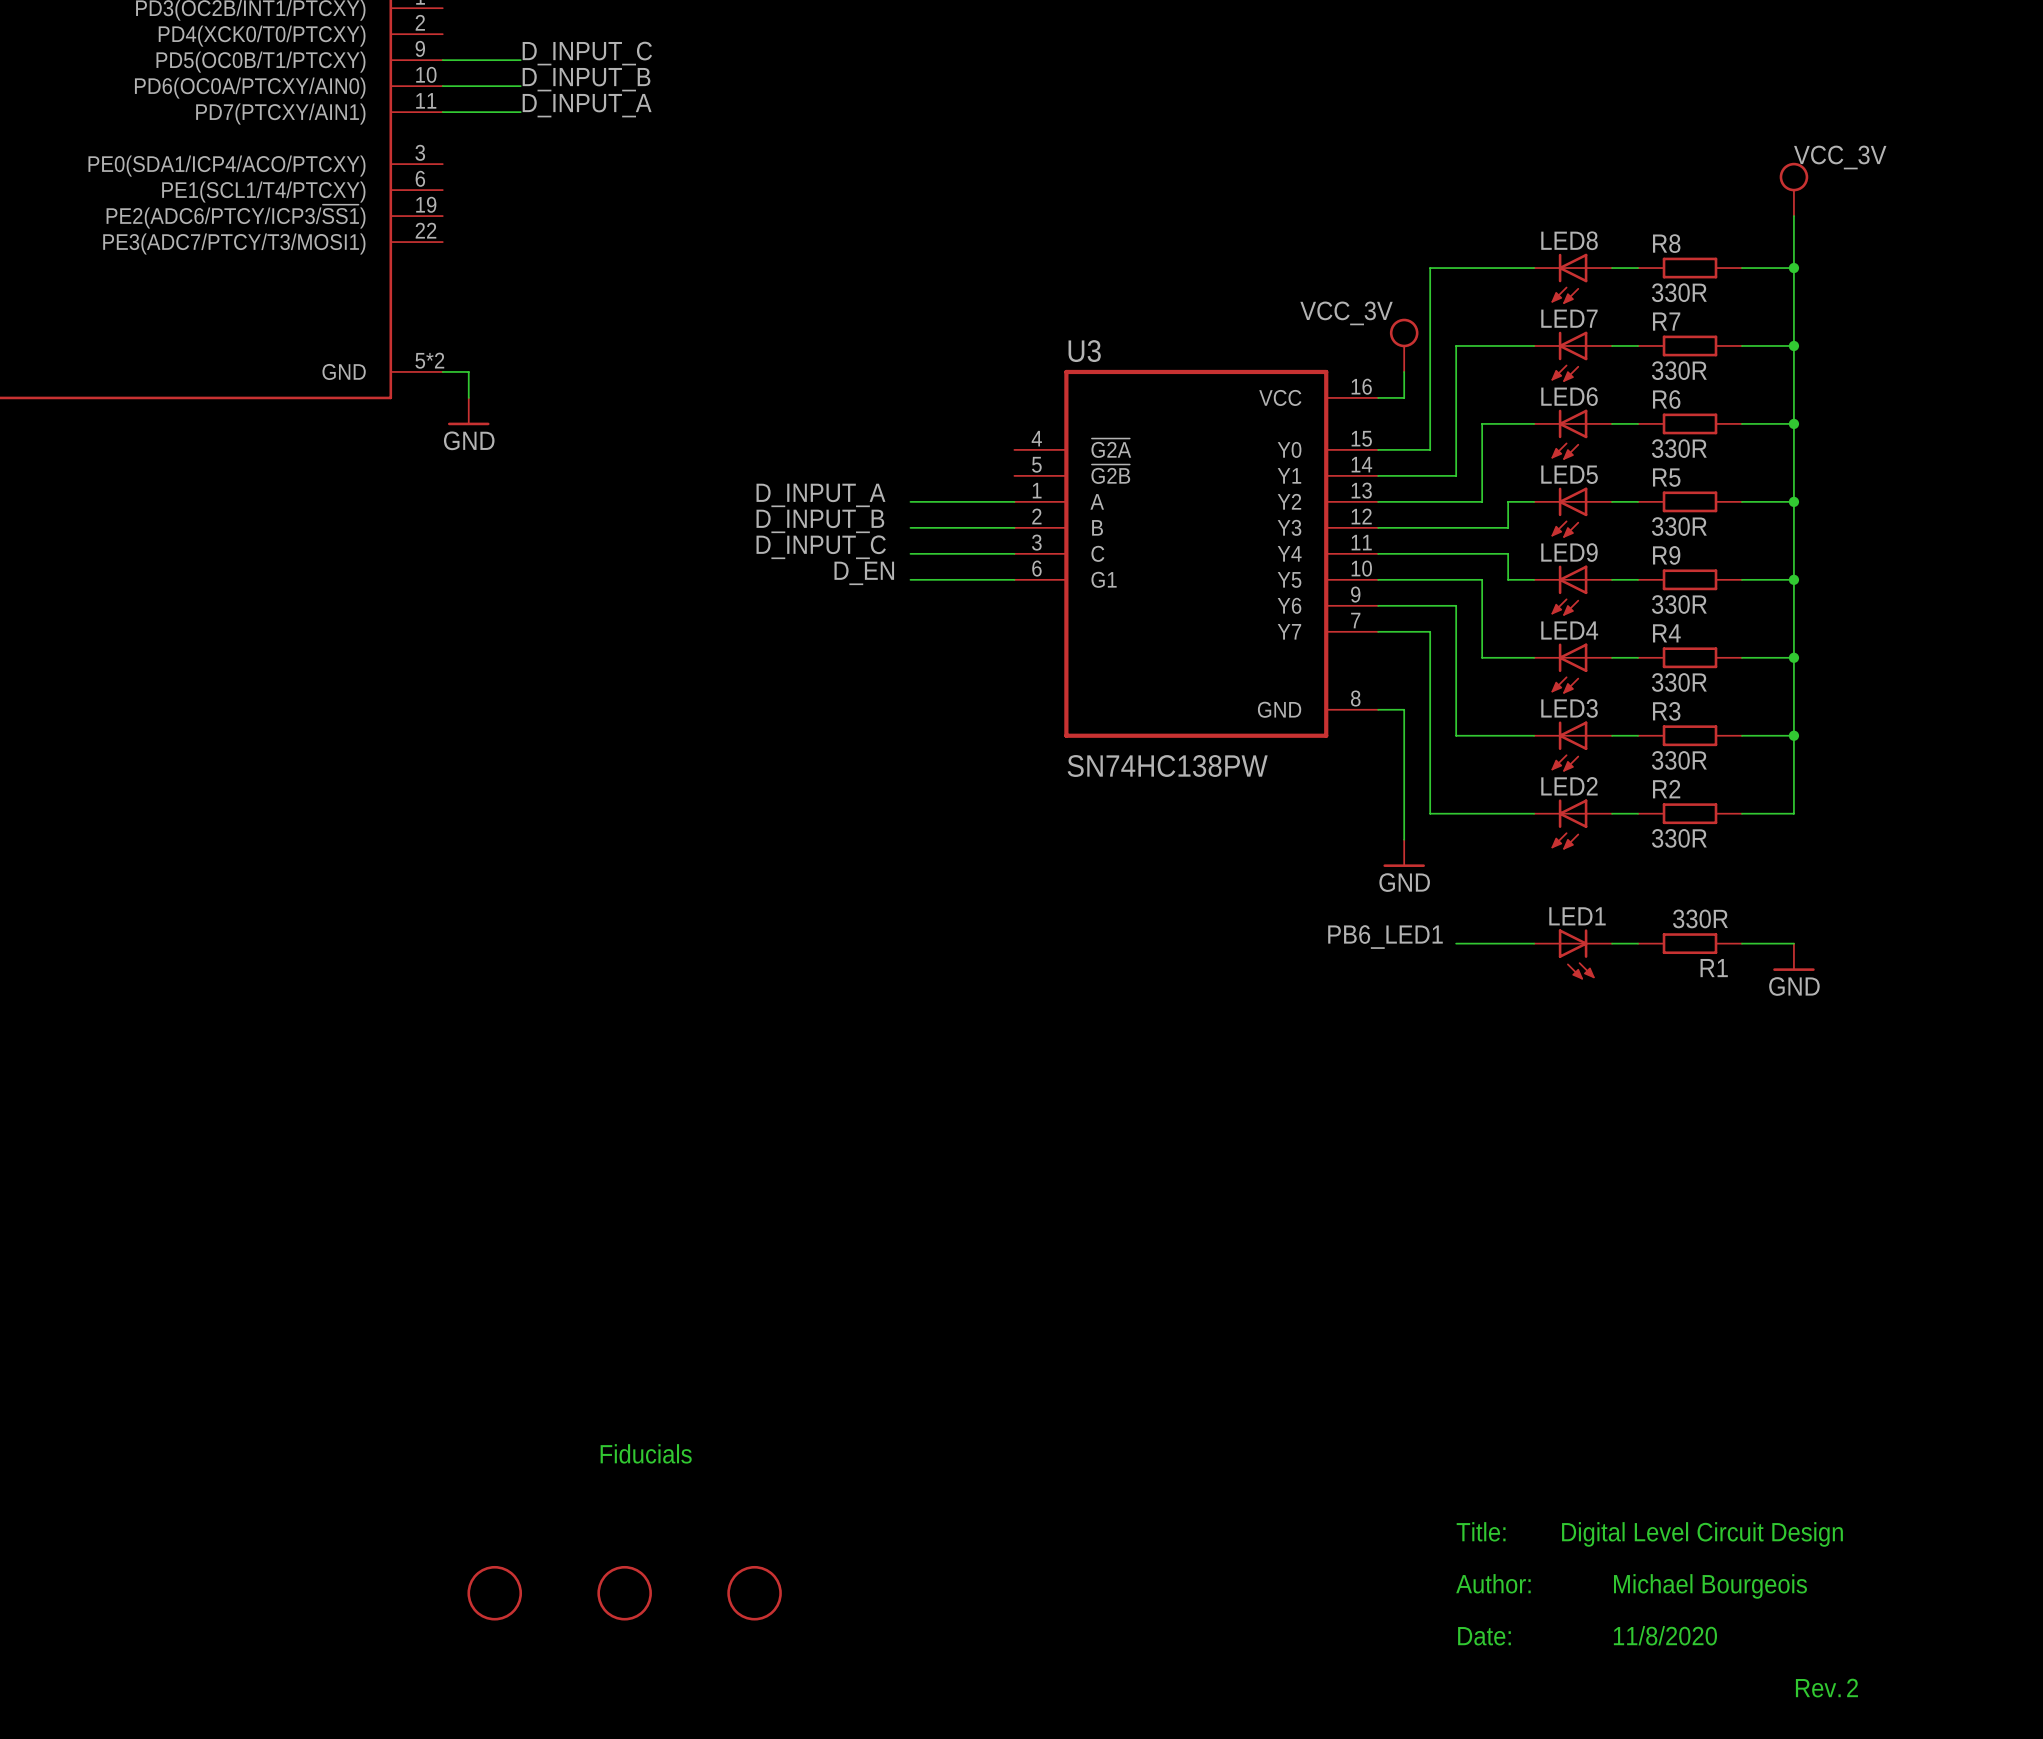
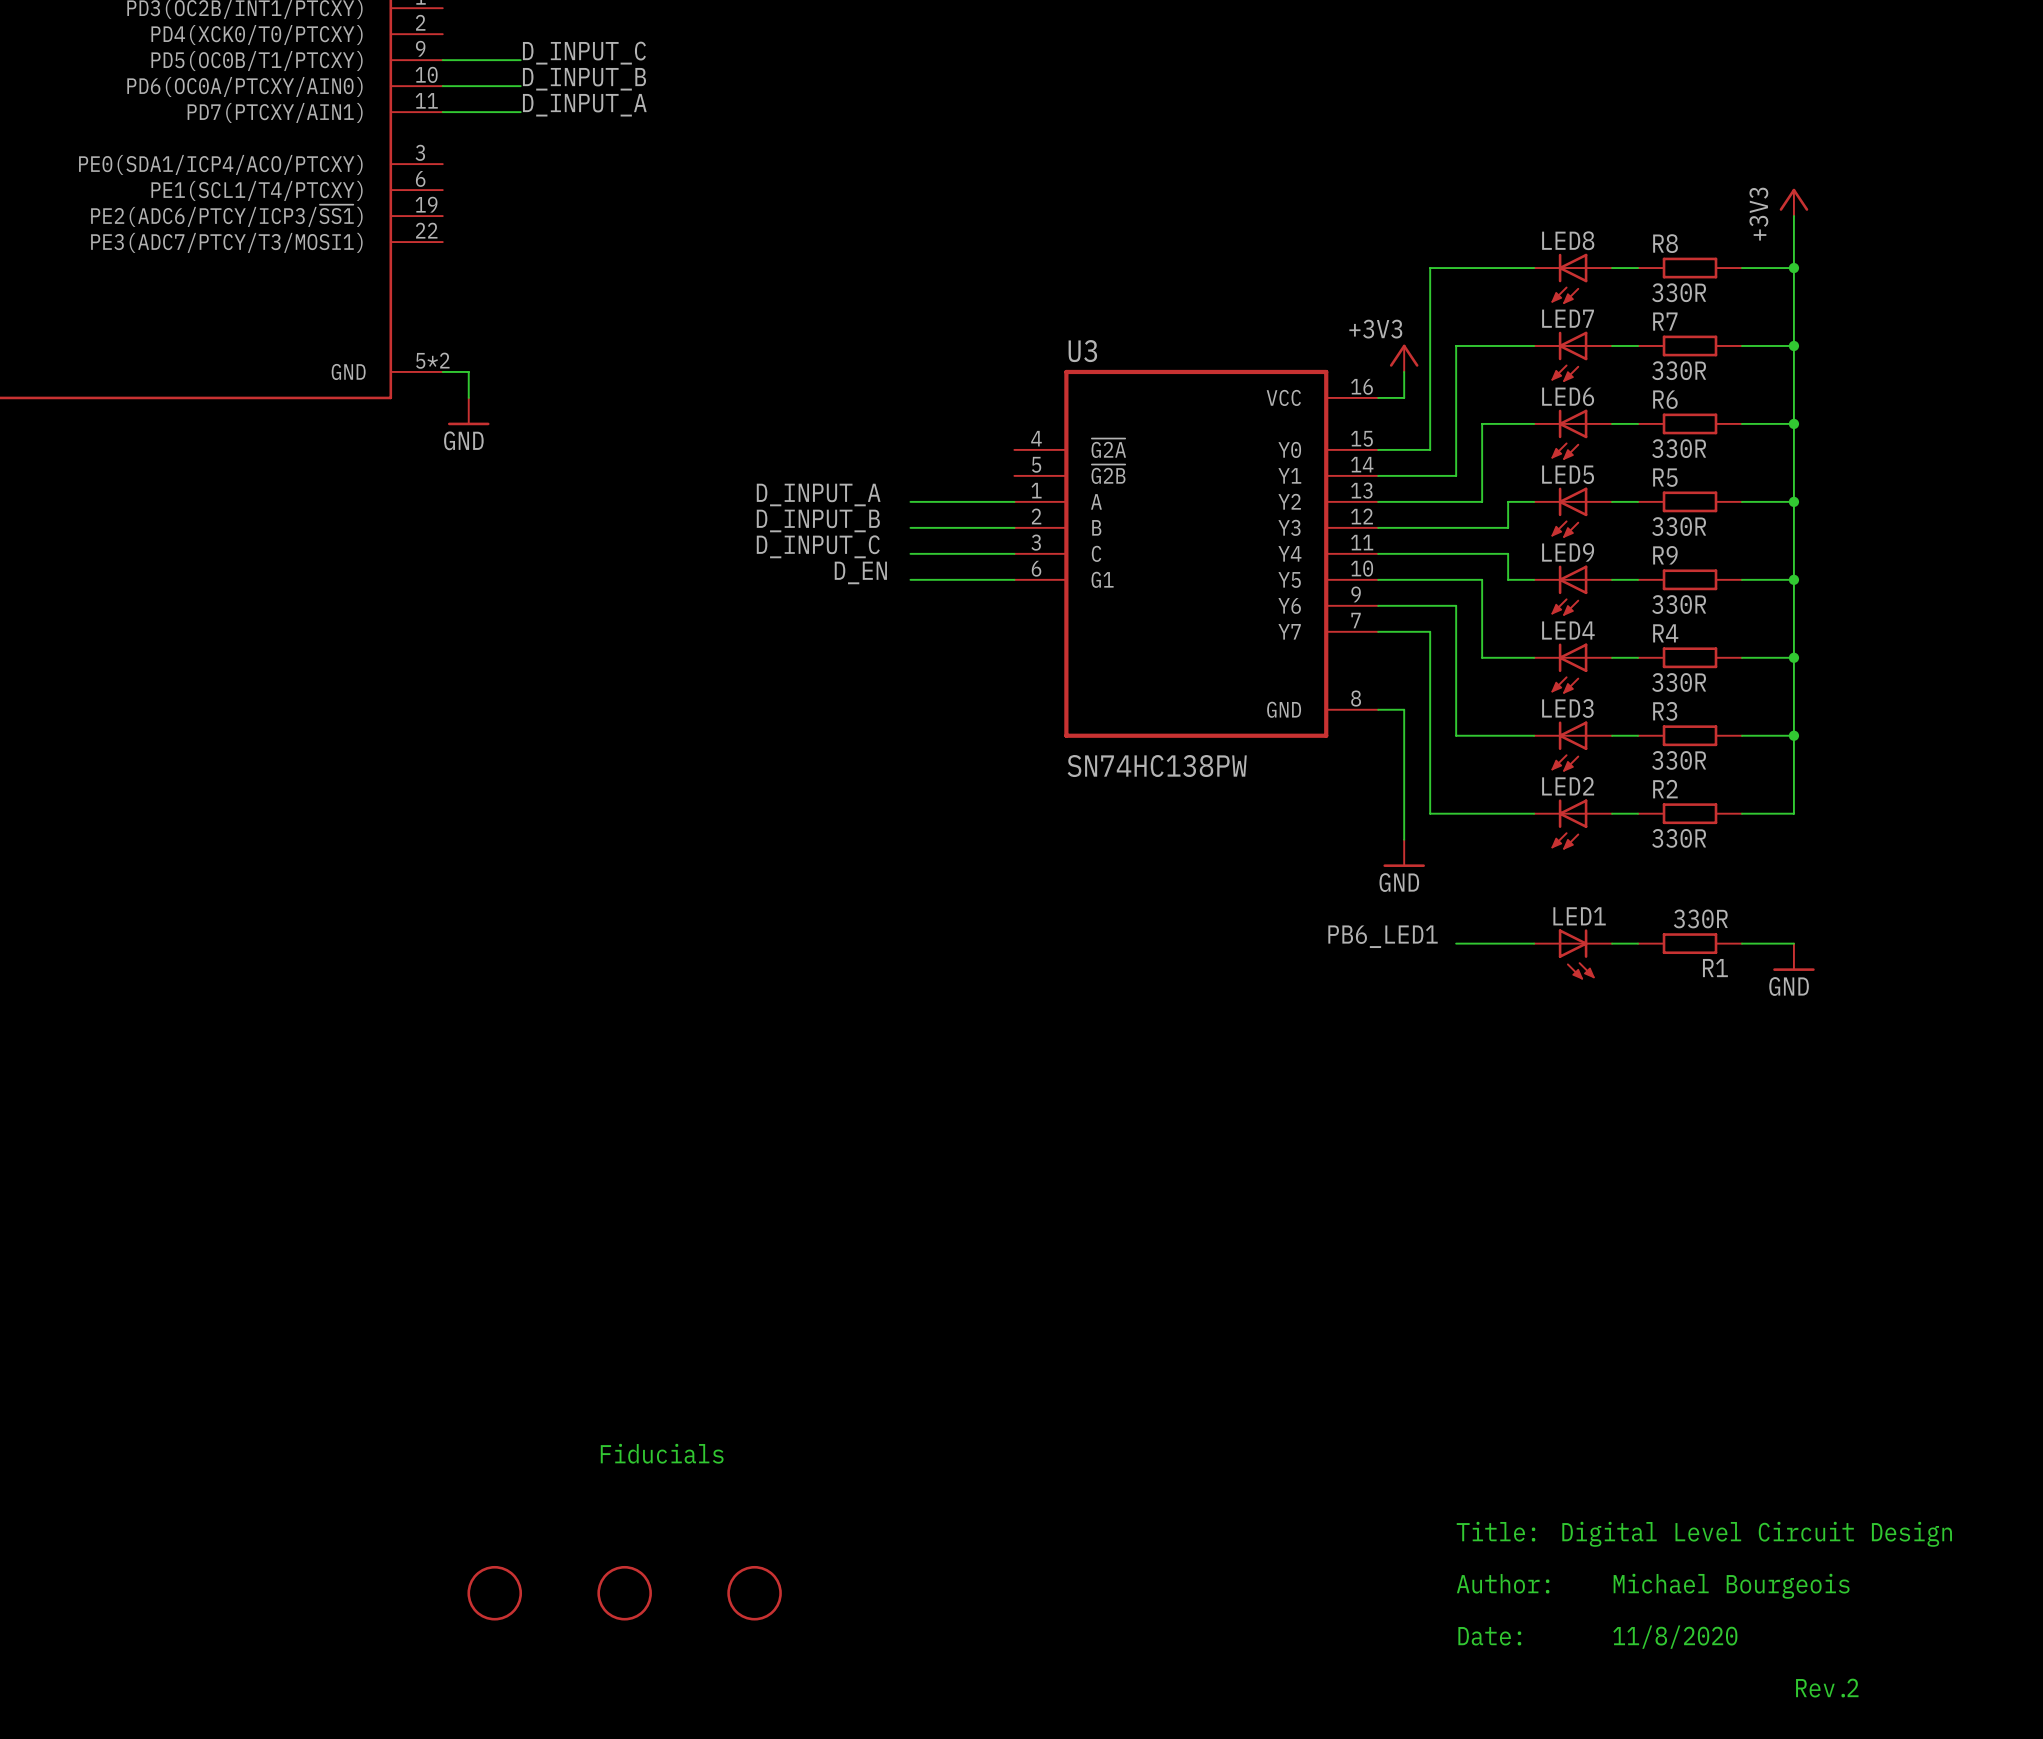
power symbol: (1793, 189) -> none
power symbol: none -> +3V3 (1793, 202)
power symbol: (1404, 345) -> none
power symbol: none -> +3V3 (1404, 358)

